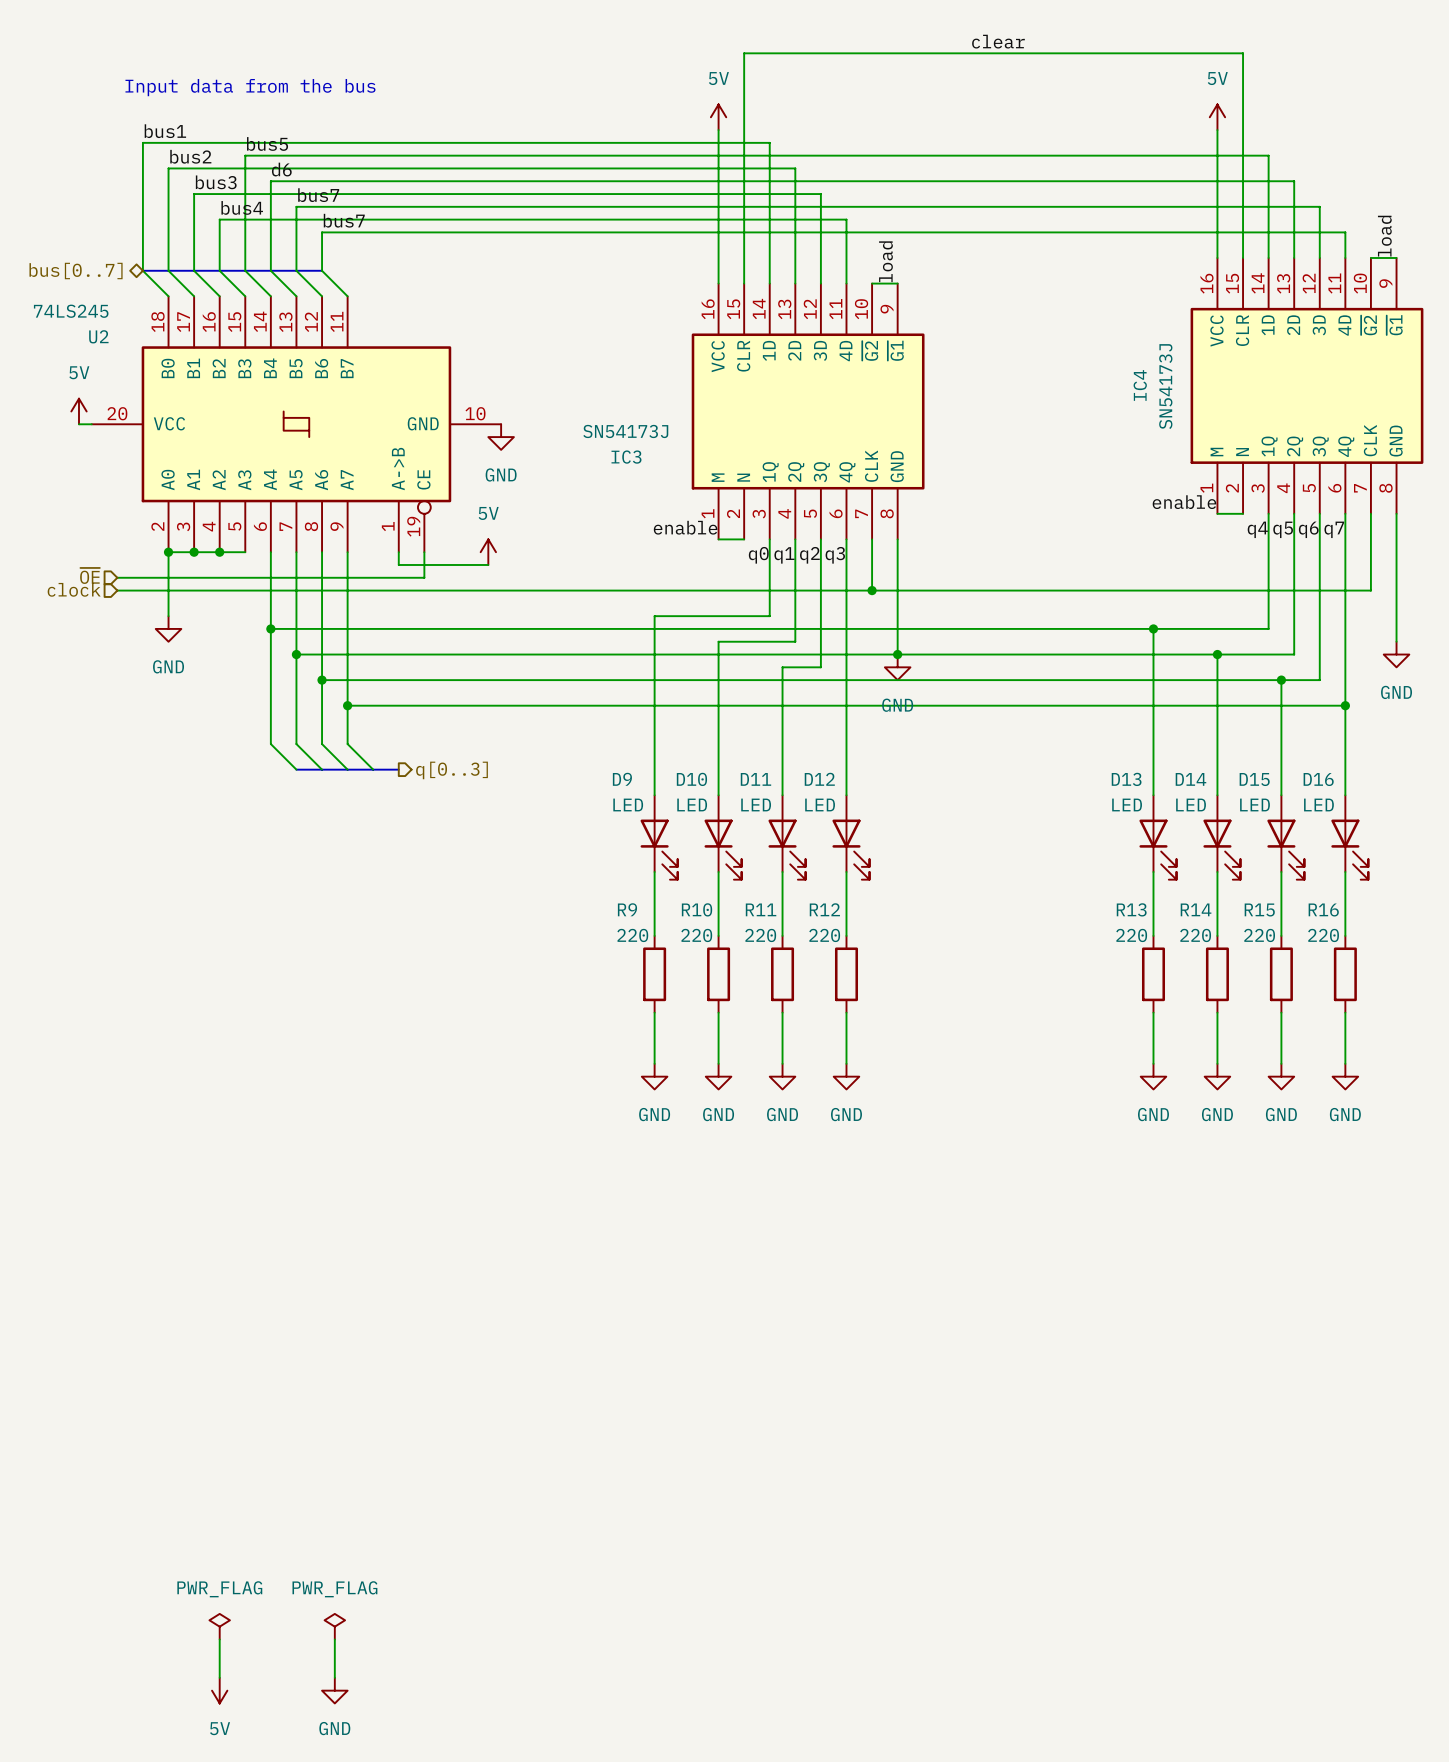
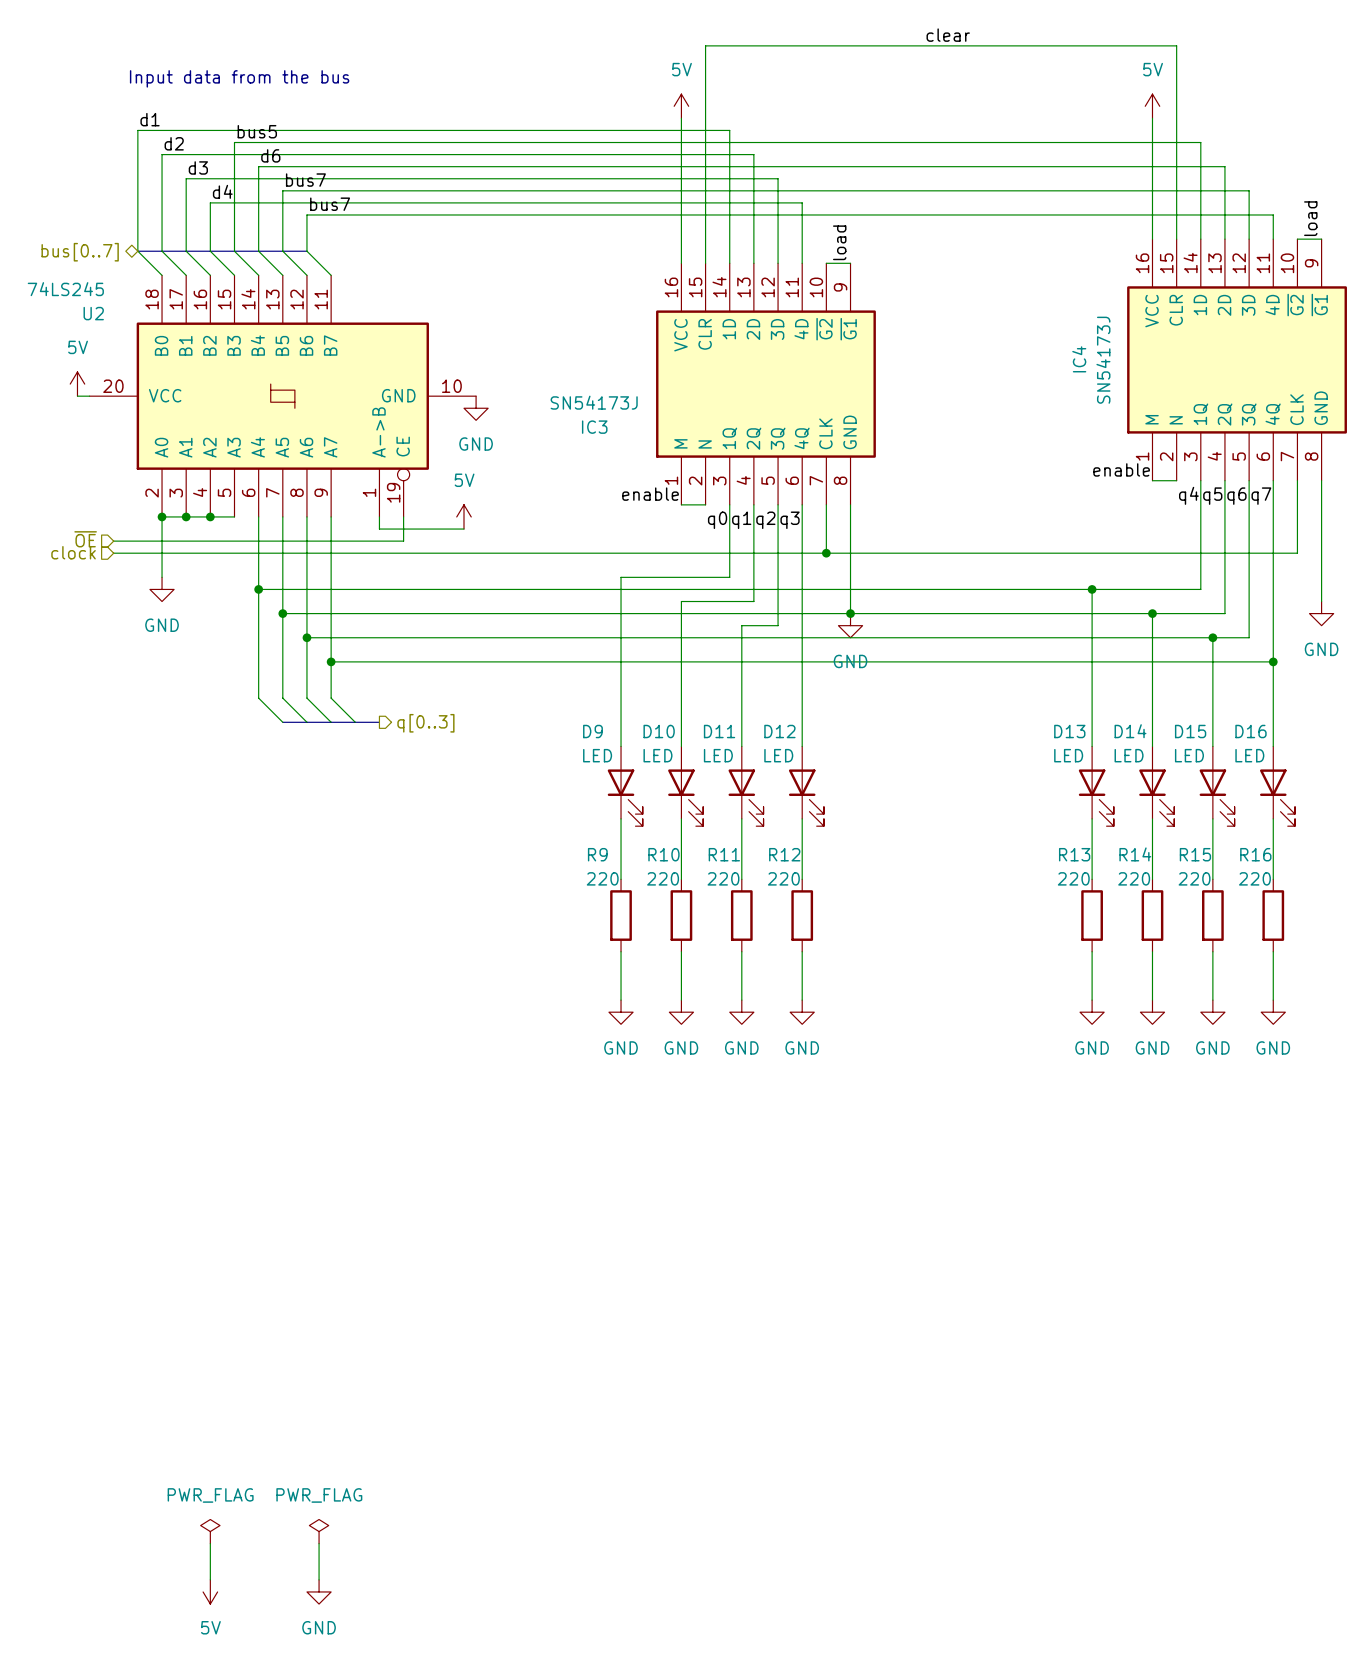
label: bus1 (165, 131) -> d1 (150, 119)
label: bus2 (190, 156) -> d2 (174, 143)
label: bus3 (216, 182) -> d3 (198, 167)
label: bus4 (242, 207) -> d4 (222, 191)

